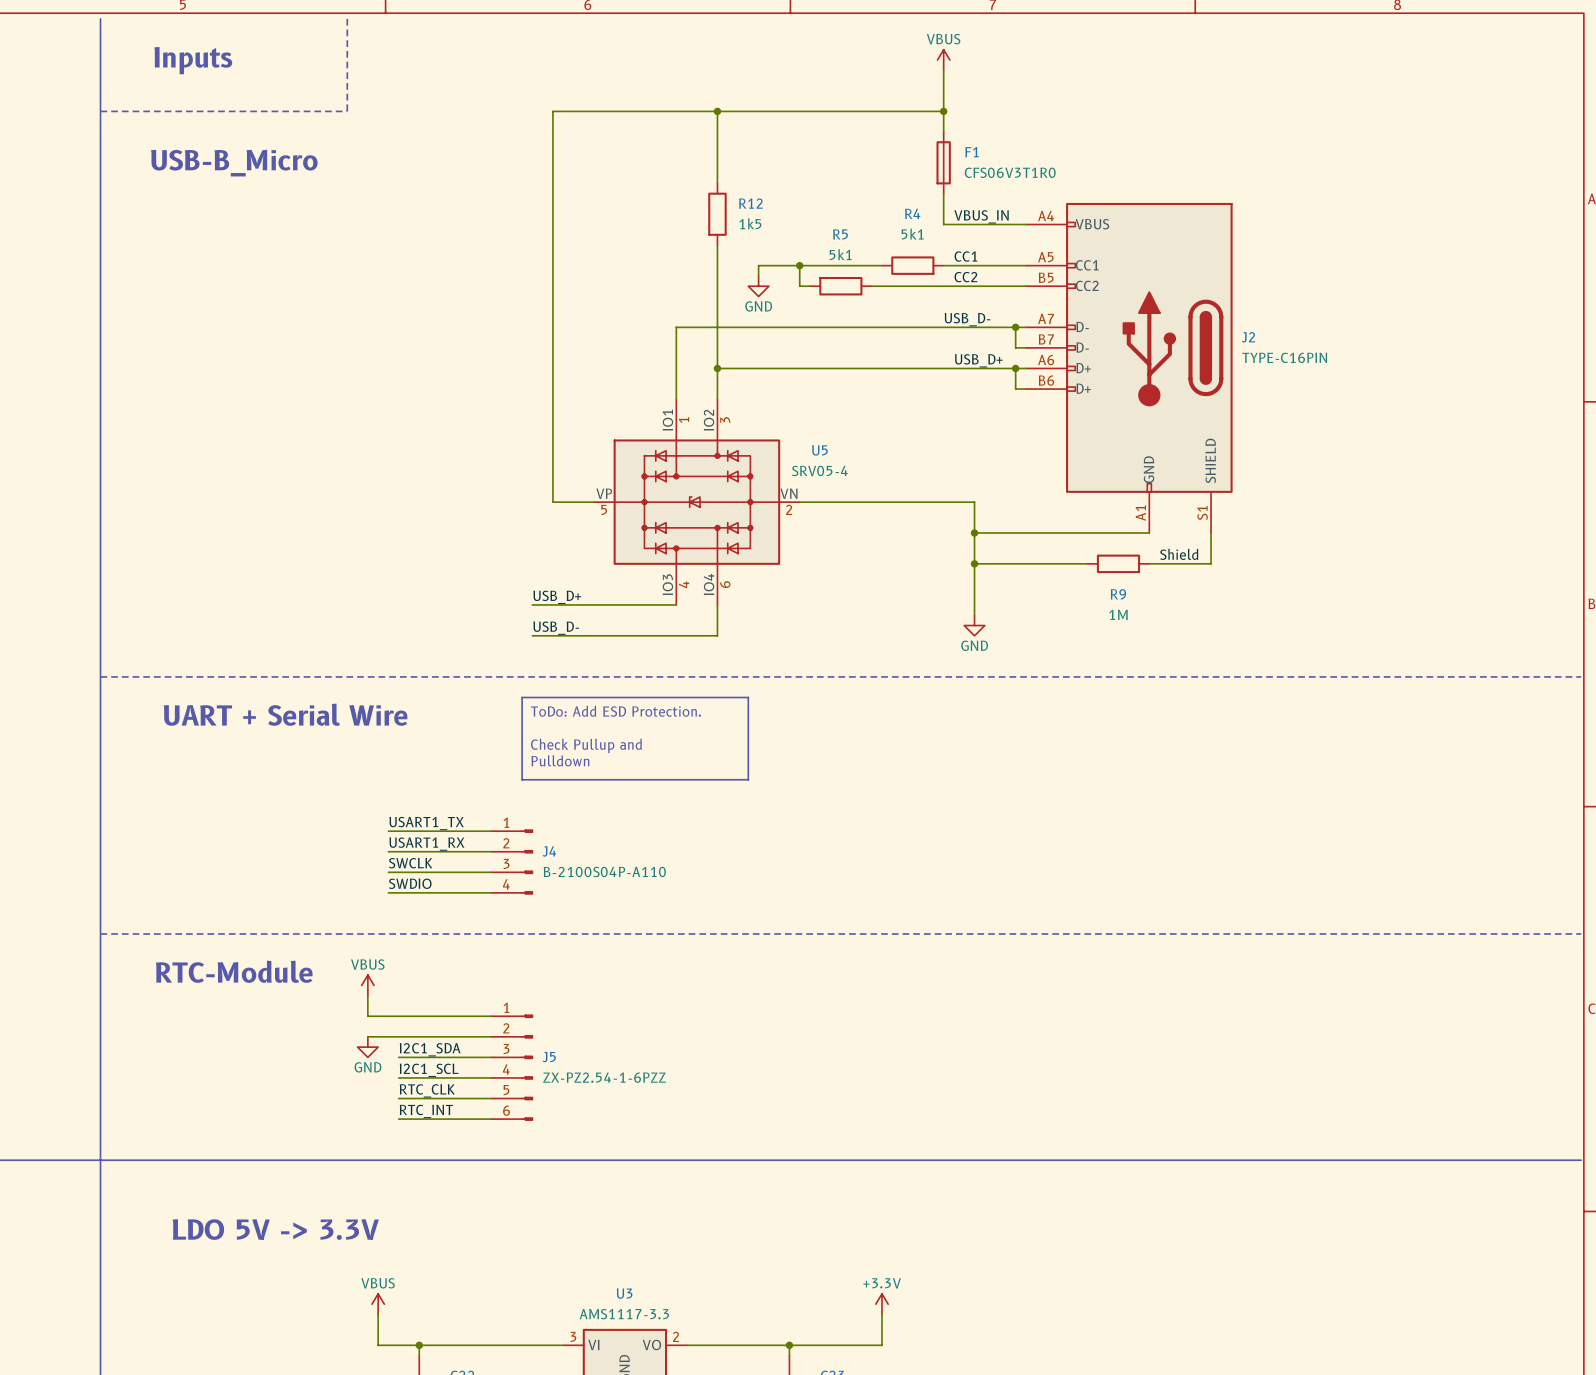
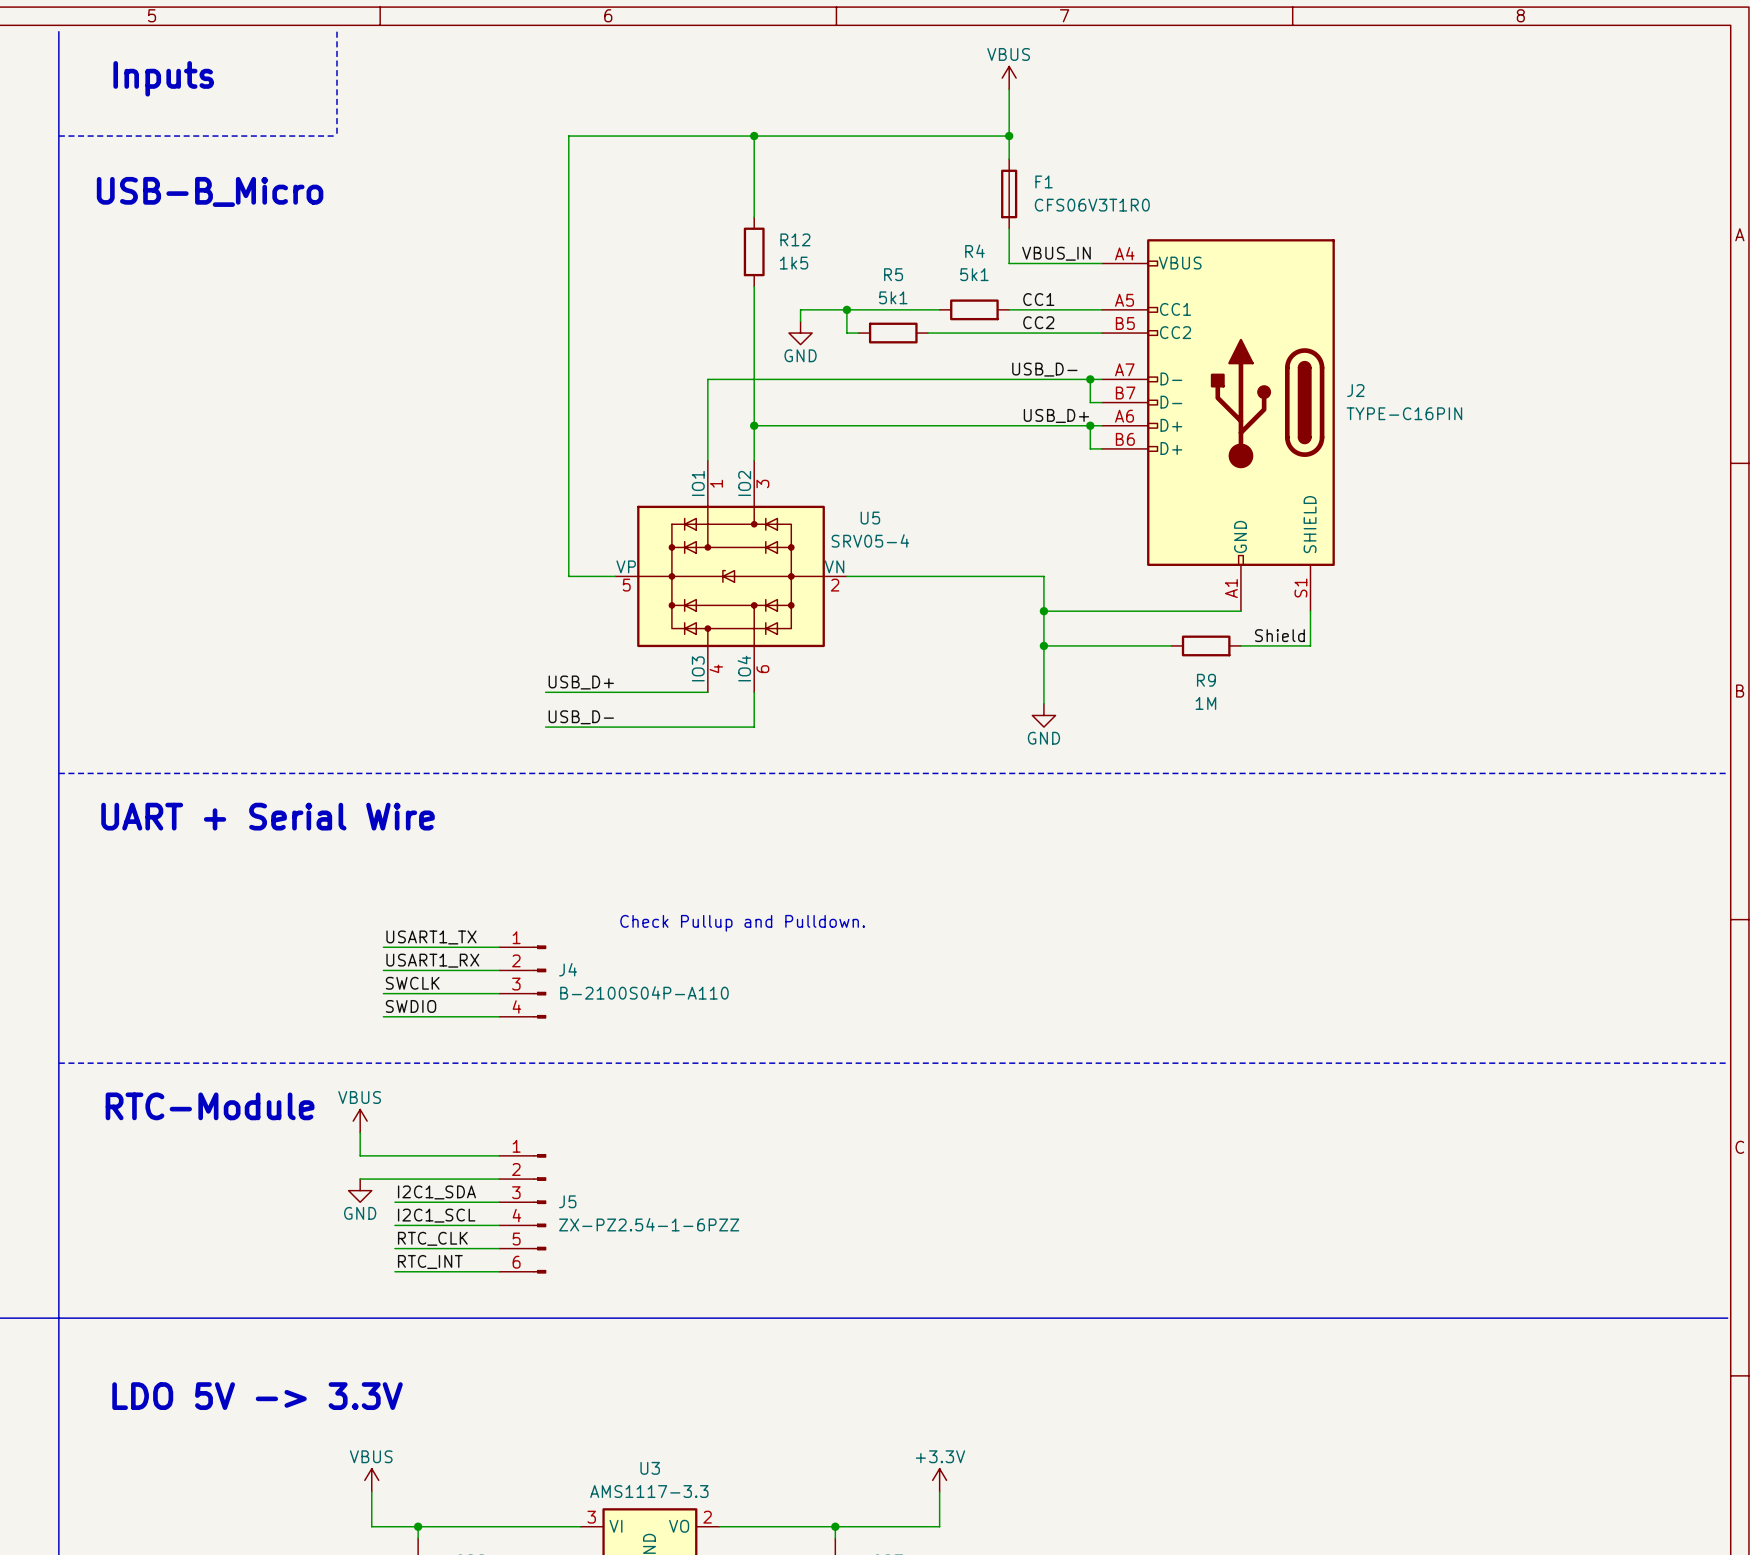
line: (522, 697) (748, 697) (748, 779) (522, 779) (522, 697) -> none
text: ToDo: Add ESD Protection. (615, 711) -> none
text: Check Pullup and (586, 745) -> none
text: Pulldown (560, 760) -> none
text: none -> Check Pullup and Pulldown. (742, 923)

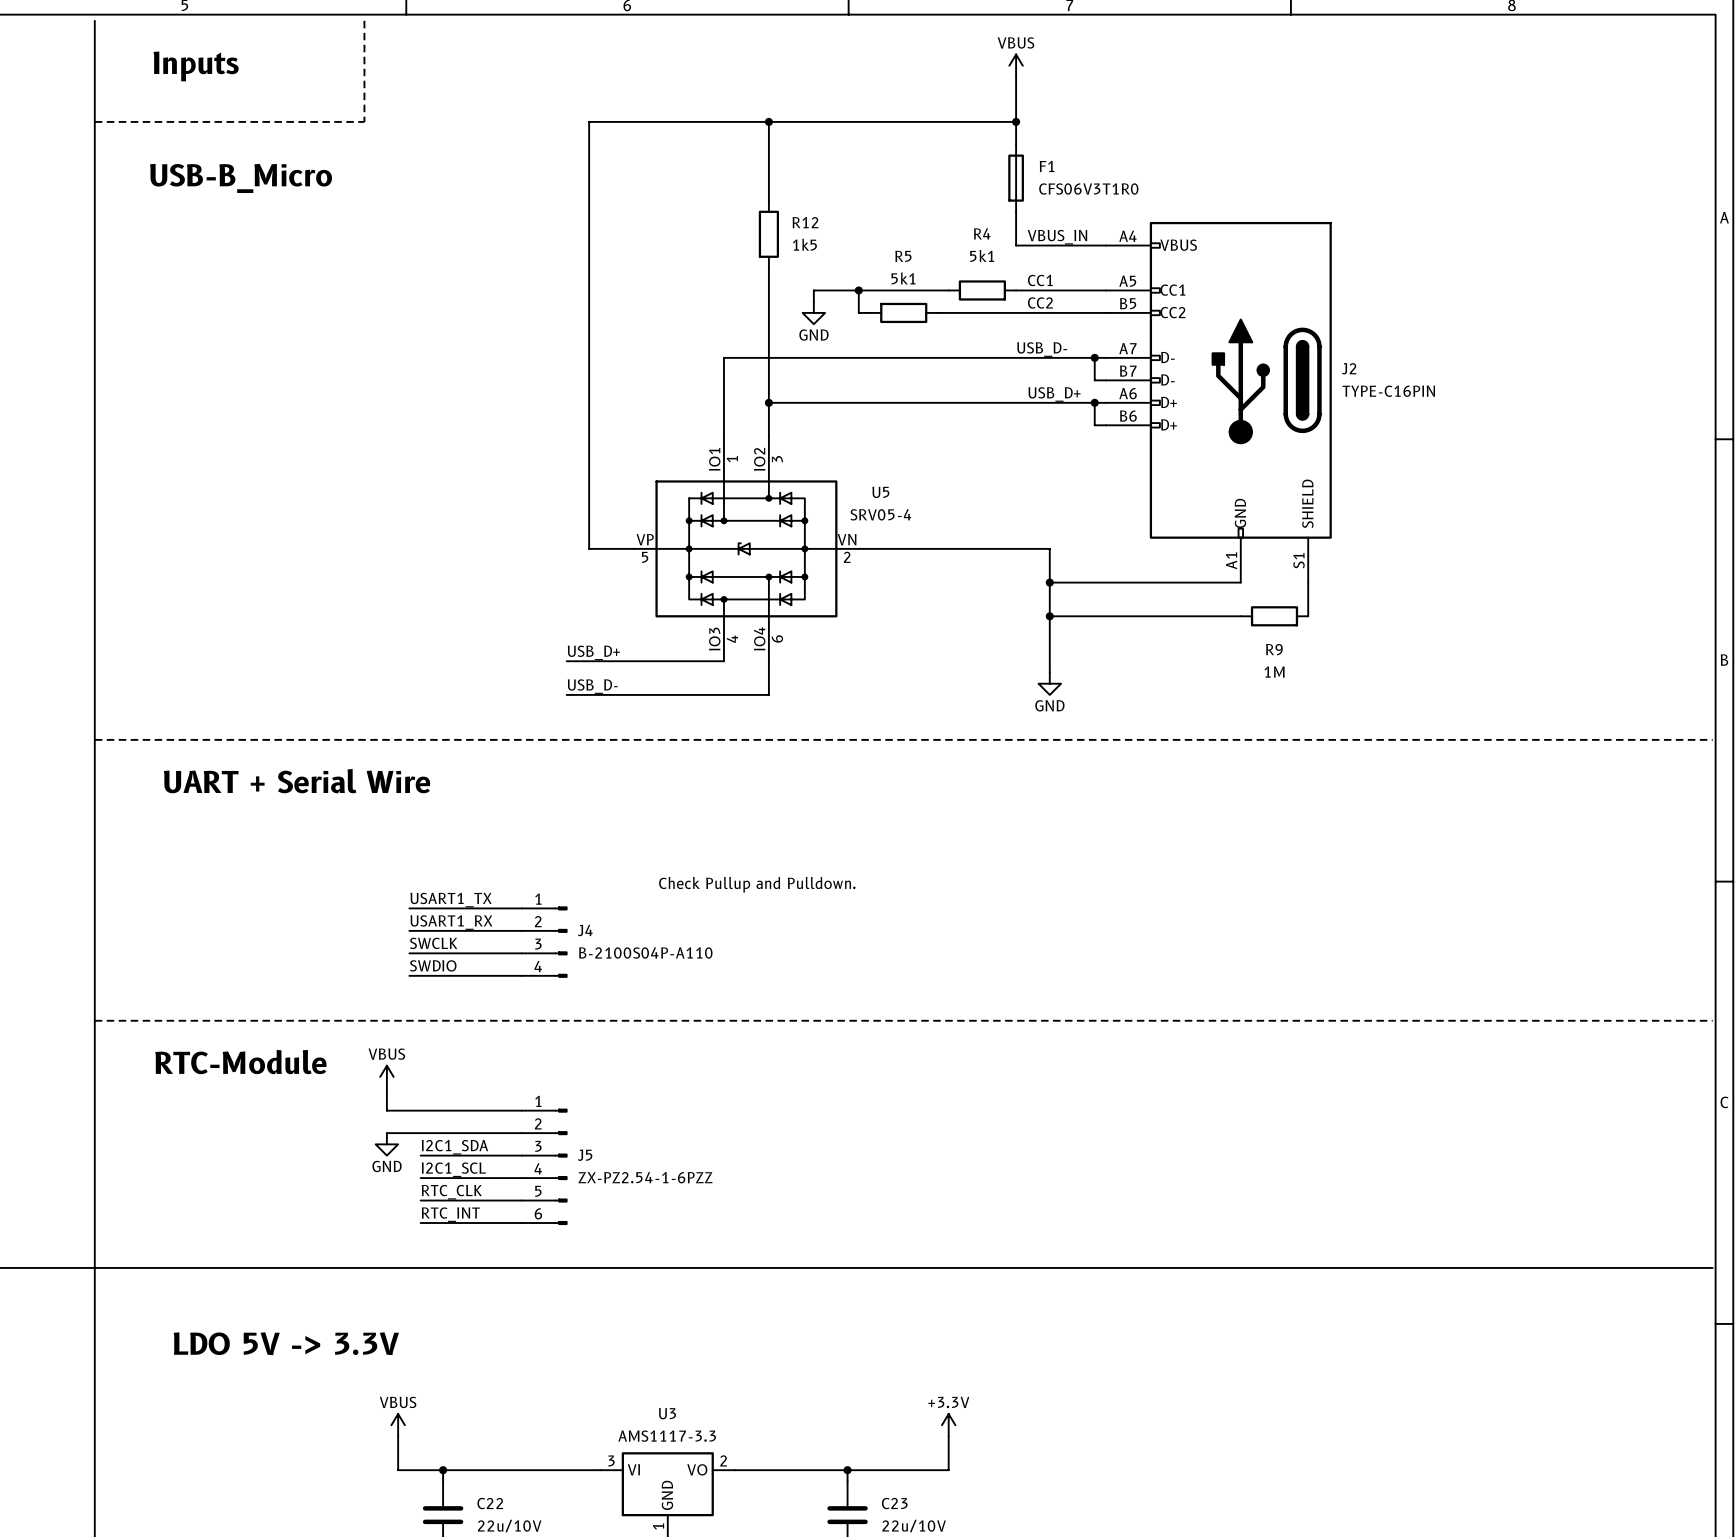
label: Shield (1279, 635) -> none
R9 position: (1206, 645) -> (1274, 616)
wire: (1240, 645) (1310, 645) -> (1240, 616) (1173, 616)

